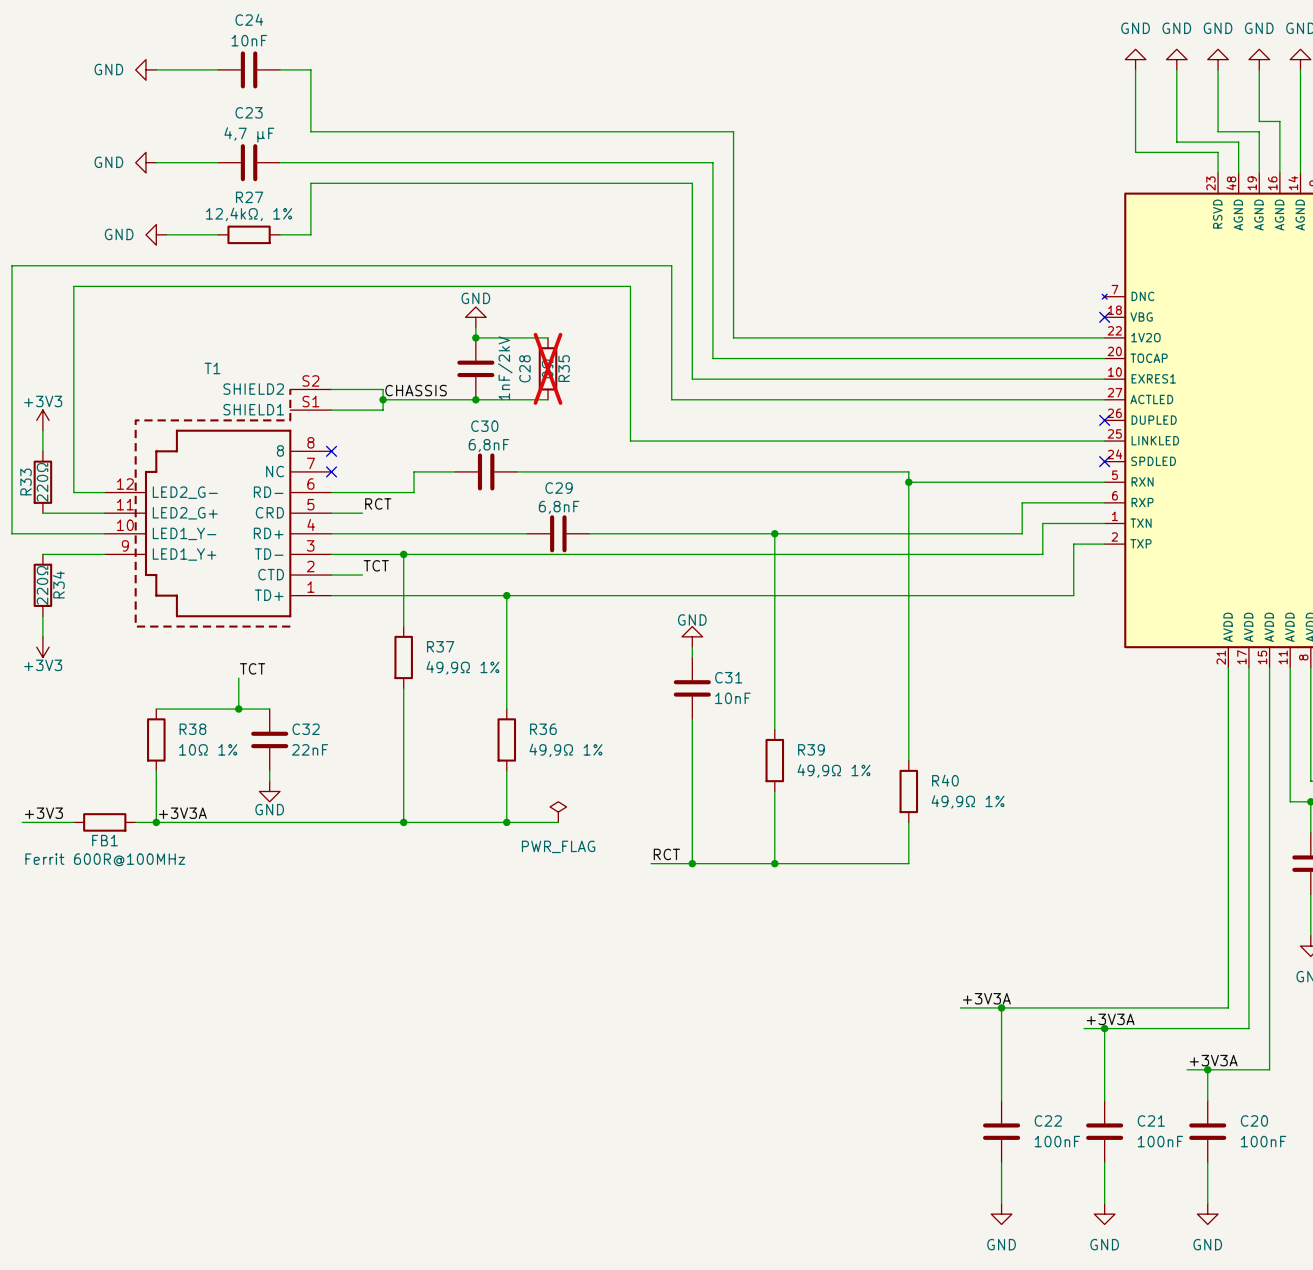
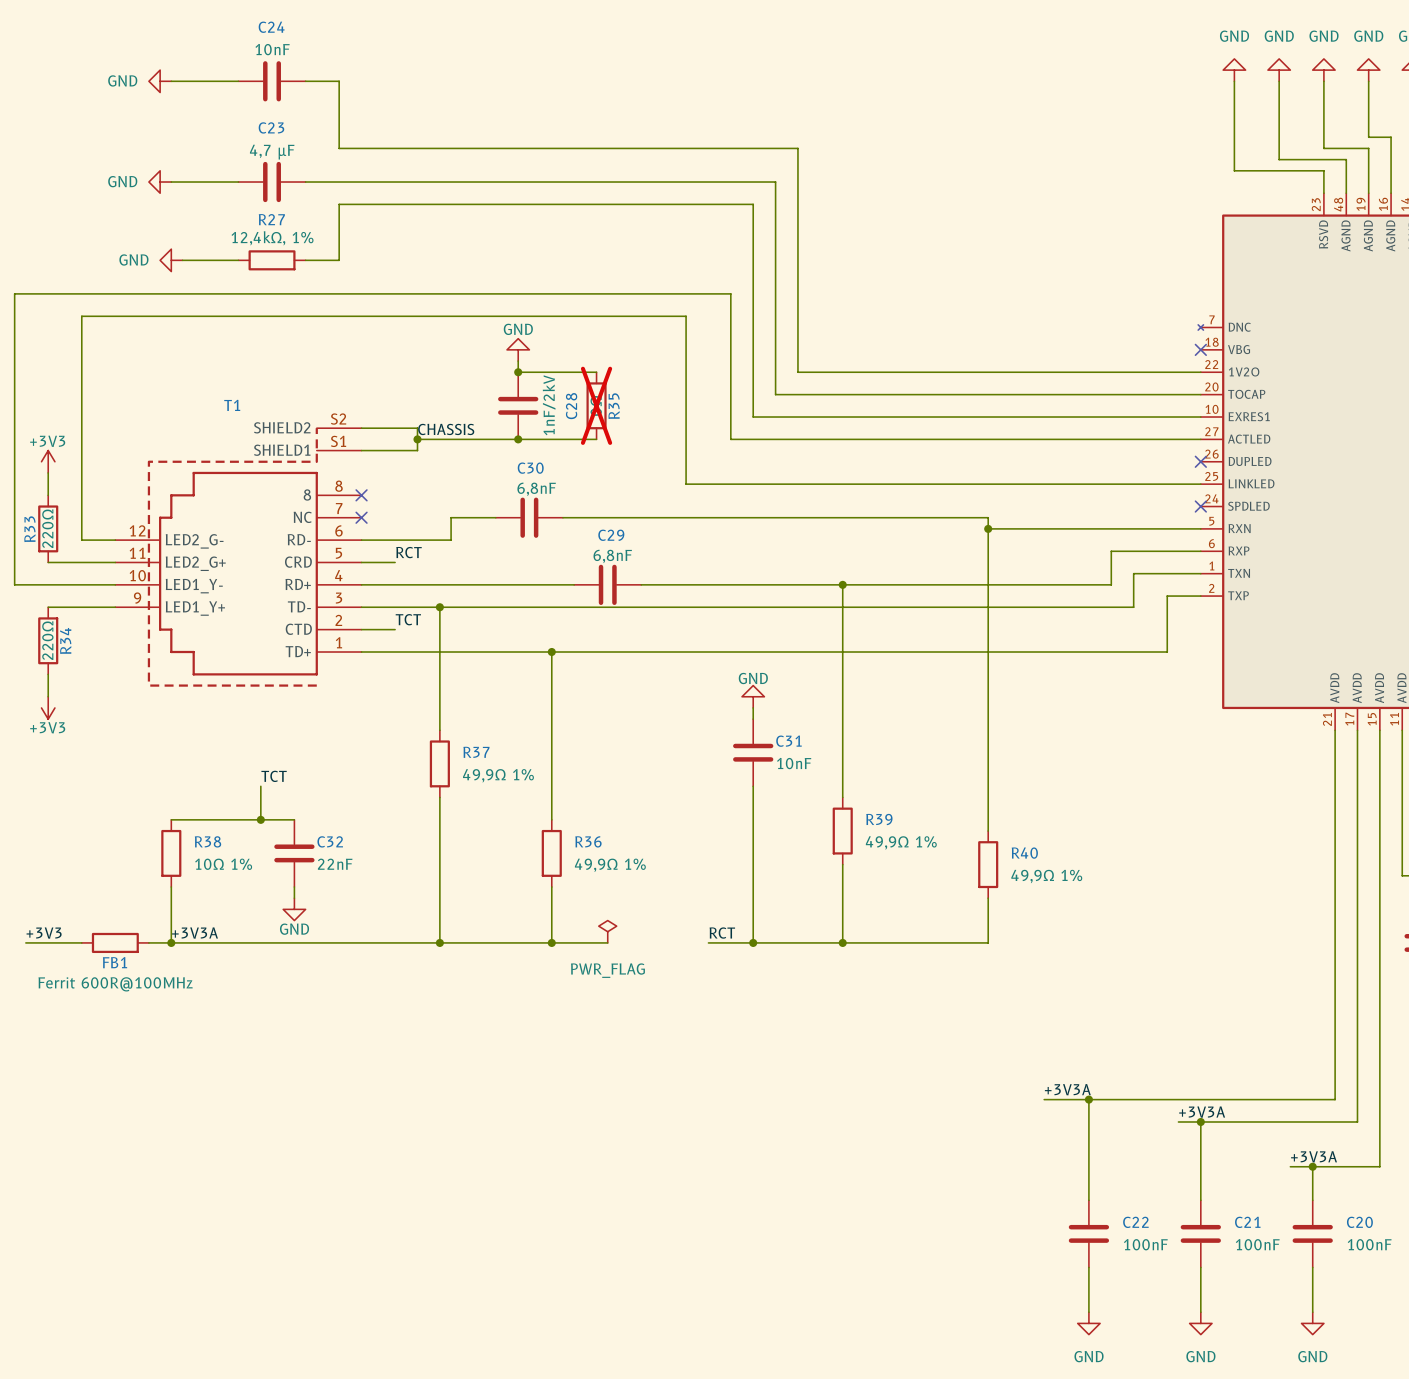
R37 position: (403, 657) -> (439, 763)
label position: TCT (252, 668) -> TCT (274, 776)
wire: (238, 678) (238, 709) -> (260, 786) (260, 819)
wire: (403, 688) (403, 729) -> (439, 685) (439, 730)
wire: (156, 709) (269, 709) -> (171, 819) (294, 819)
junction position: (238, 709) -> (260, 819)
wire: none -> (551, 775) (551, 819)
R38 position: (156, 739) -> (171, 853)
C32 position: (269, 739) -> (294, 853)
R36 position: (506, 739) -> (551, 853)
wire: (156, 770) (156, 812) -> (171, 898) (171, 942)
wire: (506, 770) (506, 812) -> (551, 898) (551, 942)
power symbol position: GND (269, 791) -> GND (294, 909)
power symbol position: PWR_FLAG (558, 812) -> PWR_FLAG (607, 931)
label position: +3V3 (43, 813) -> +3V3 (44, 933)
label position: +3V3A (182, 813) -> +3V3A (195, 933)
wire: (22, 822) (73, 822) -> (25, 942) (81, 942)
FB1 position: (104, 822) -> (115, 942)
wire: (135, 822) (558, 822) -> (148, 942) (607, 942)
junction position: (156, 822) -> (171, 942)
wire: none -> (439, 898) (439, 942)
junction position: (403, 822) -> (439, 942)
junction position: (506, 822) -> (551, 942)

